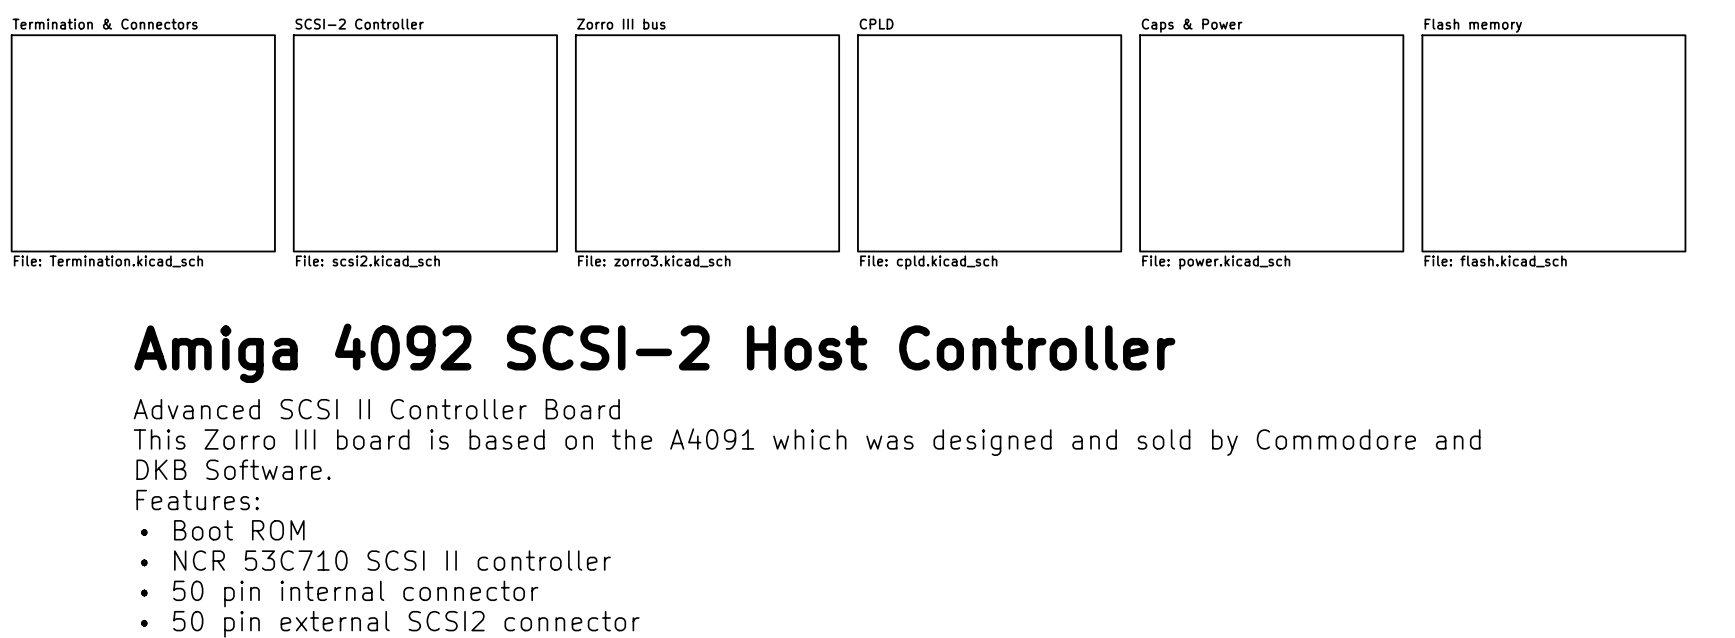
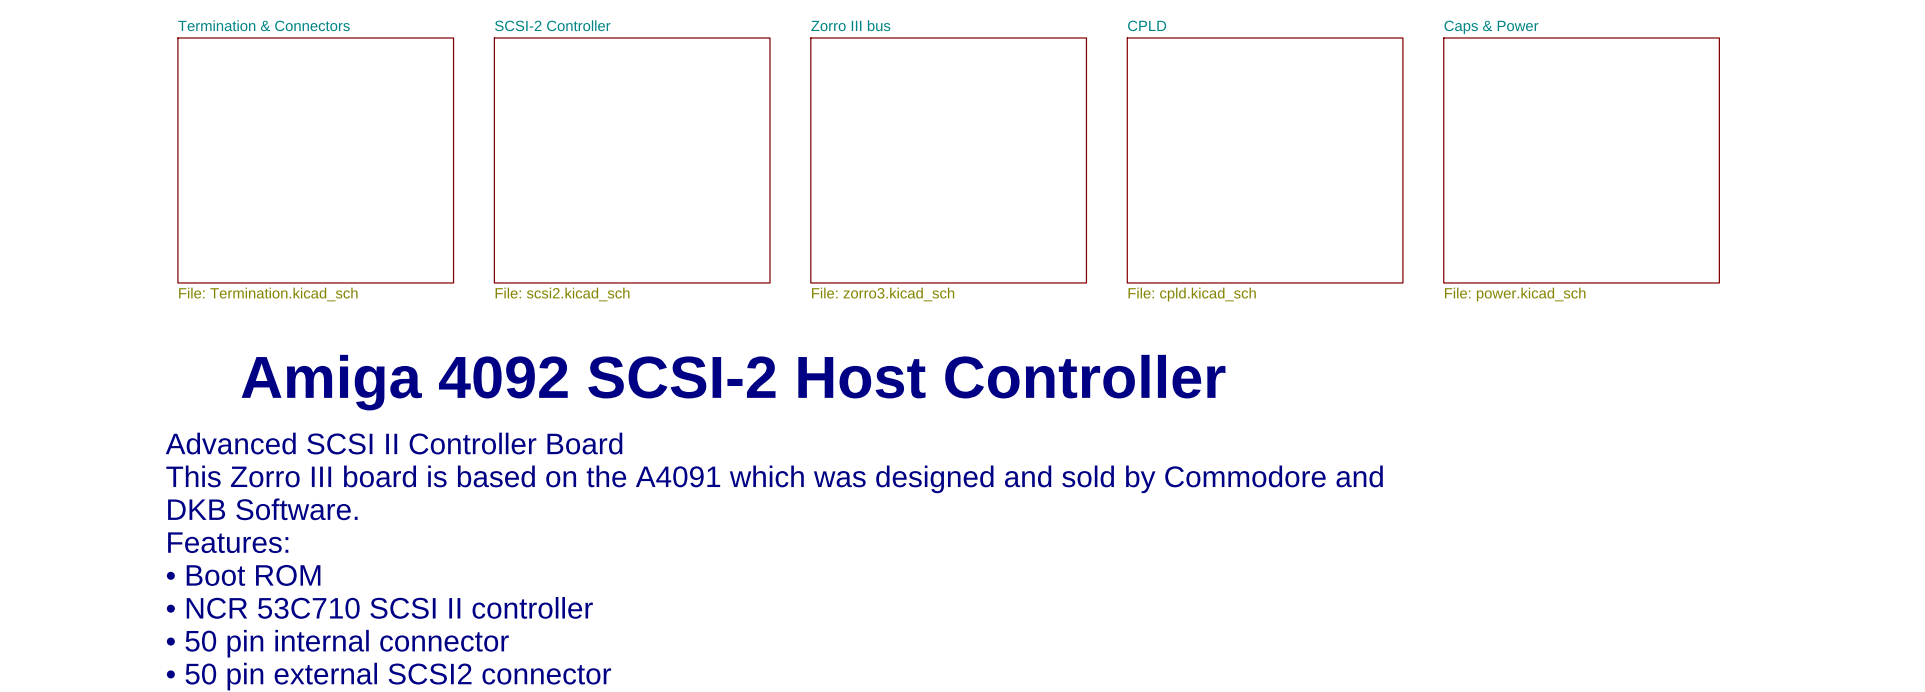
sheet SCSI-2 Controller shape: [293, 34, 558, 253] -> [493, 37, 771, 284]
sheet Termination & Connectors: File: Termination.kicad_sch (143, 143) -> none
sheet Zorro III bus: File: zorro3.kicad_sch (707, 143) -> none
sheet CPLD: File: cpld.kicad_sch (989, 143) -> none
sheet Caps & Power: File: power.kicad_sch (1271, 143) -> none
sheet Flash memory: File: flash.kicad_sch (1553, 143) -> none
sheet Termination & Connectors: none -> File: Termination.kicad_sch (315, 160)
sheet Zorro III bus: none -> File: zorro3.kicad_sch (948, 160)
sheet CPLD: none -> File: cpld.kicad_sch (1265, 160)
sheet Caps & Power: none -> File: power.kicad_sch (1581, 160)

